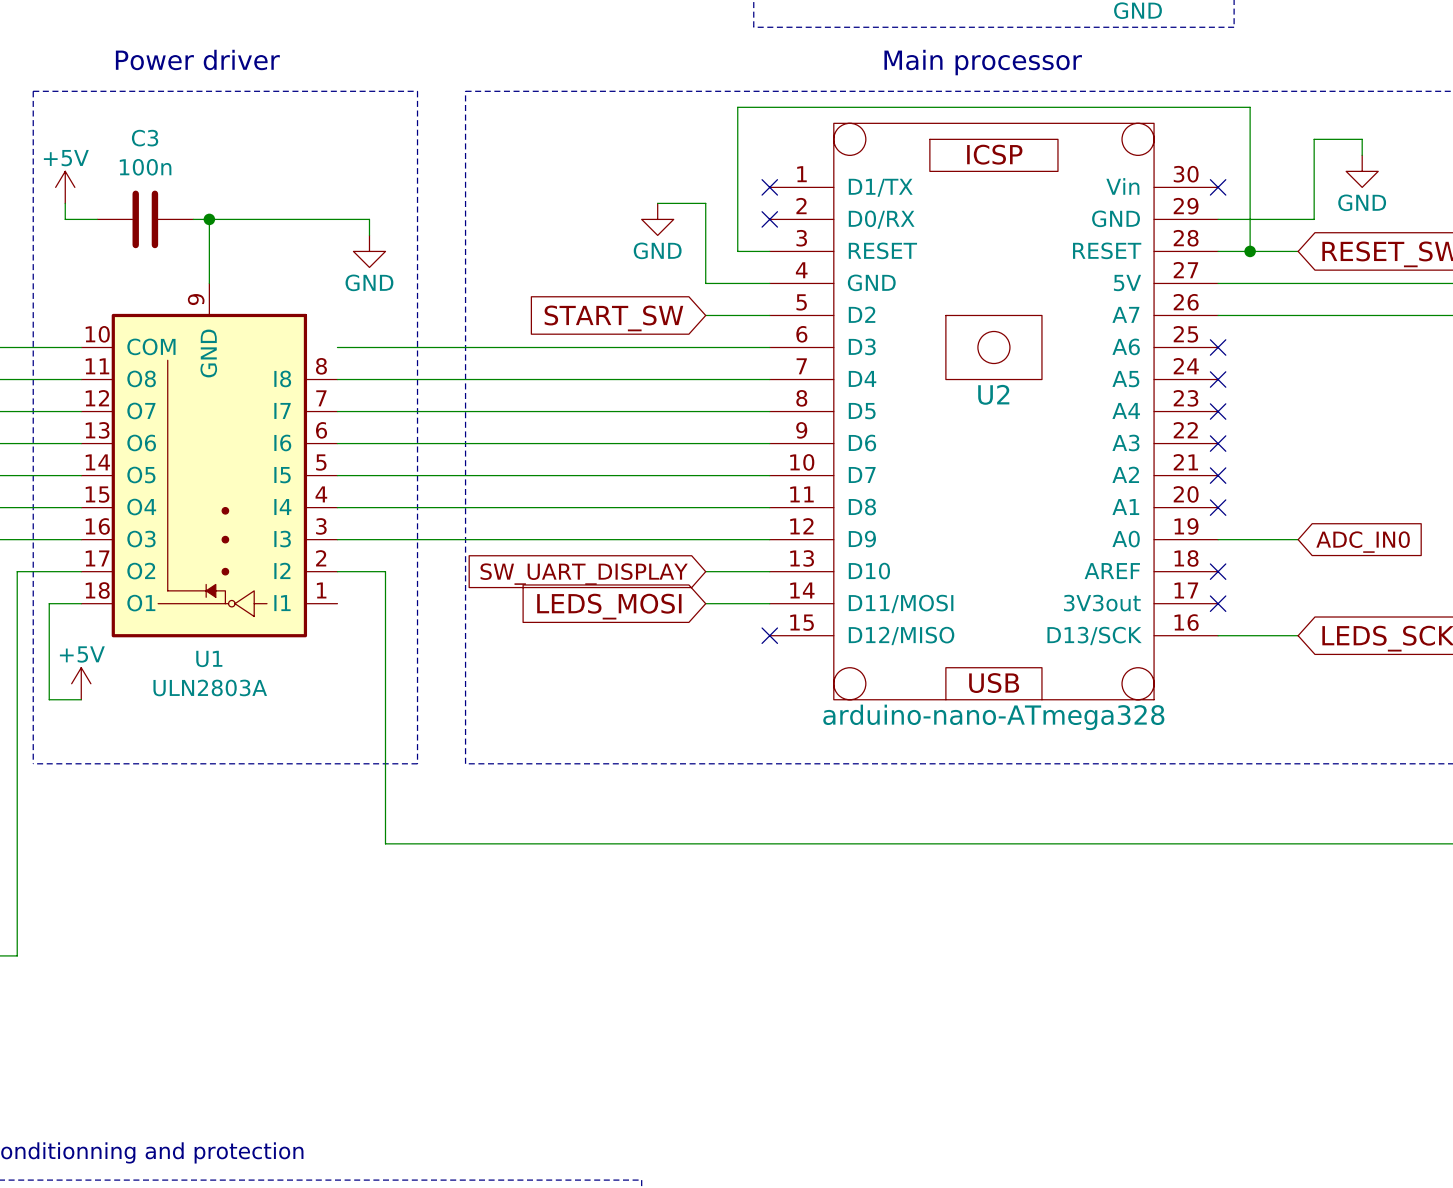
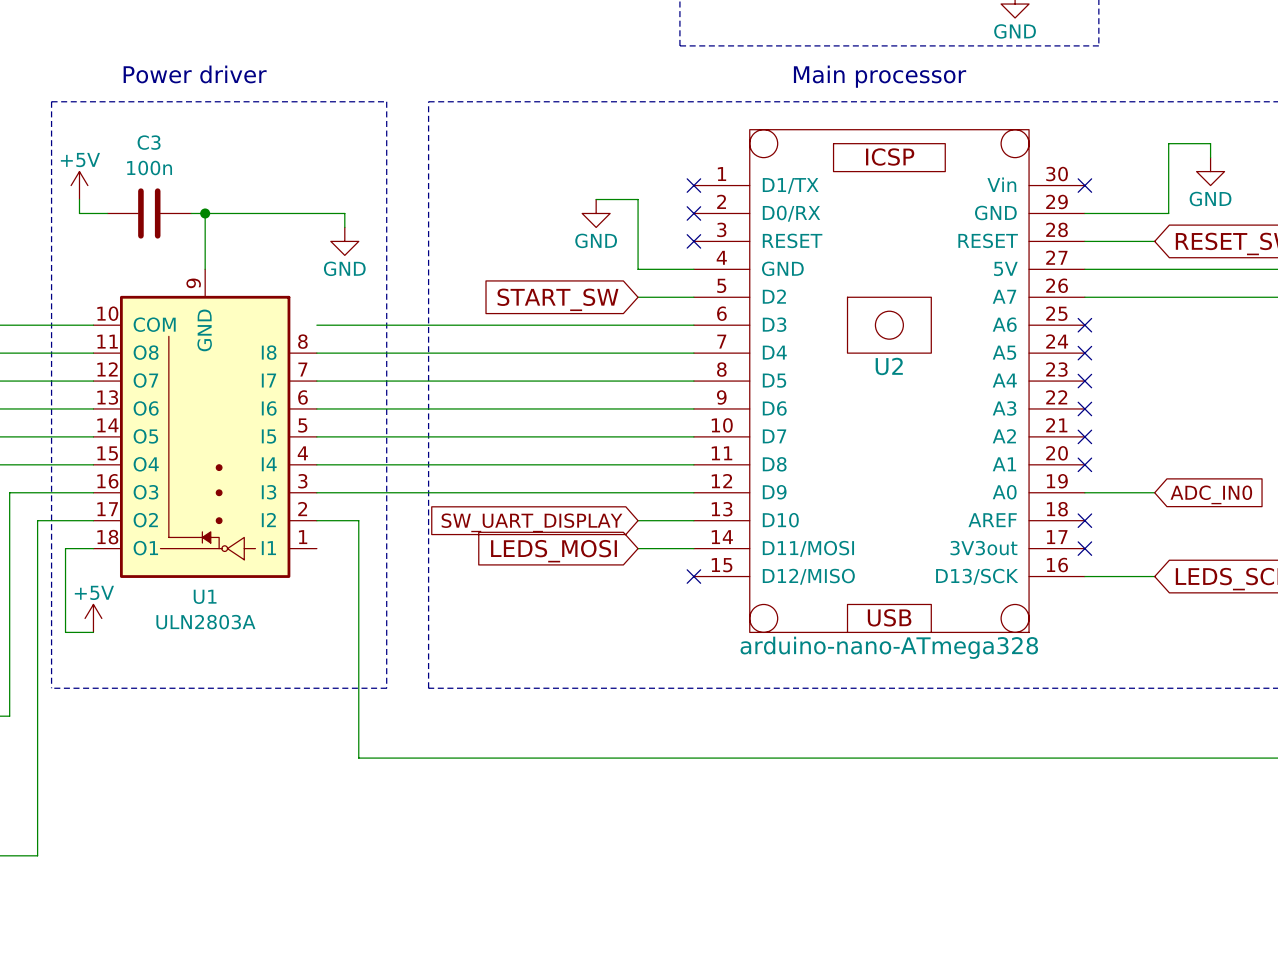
wire: (769, 251) (737, 251) (737, 107) (1250, 107) (1250, 251) -> none
no-connect mark: none -> (693, 241)
junction: (1250, 251) -> none

